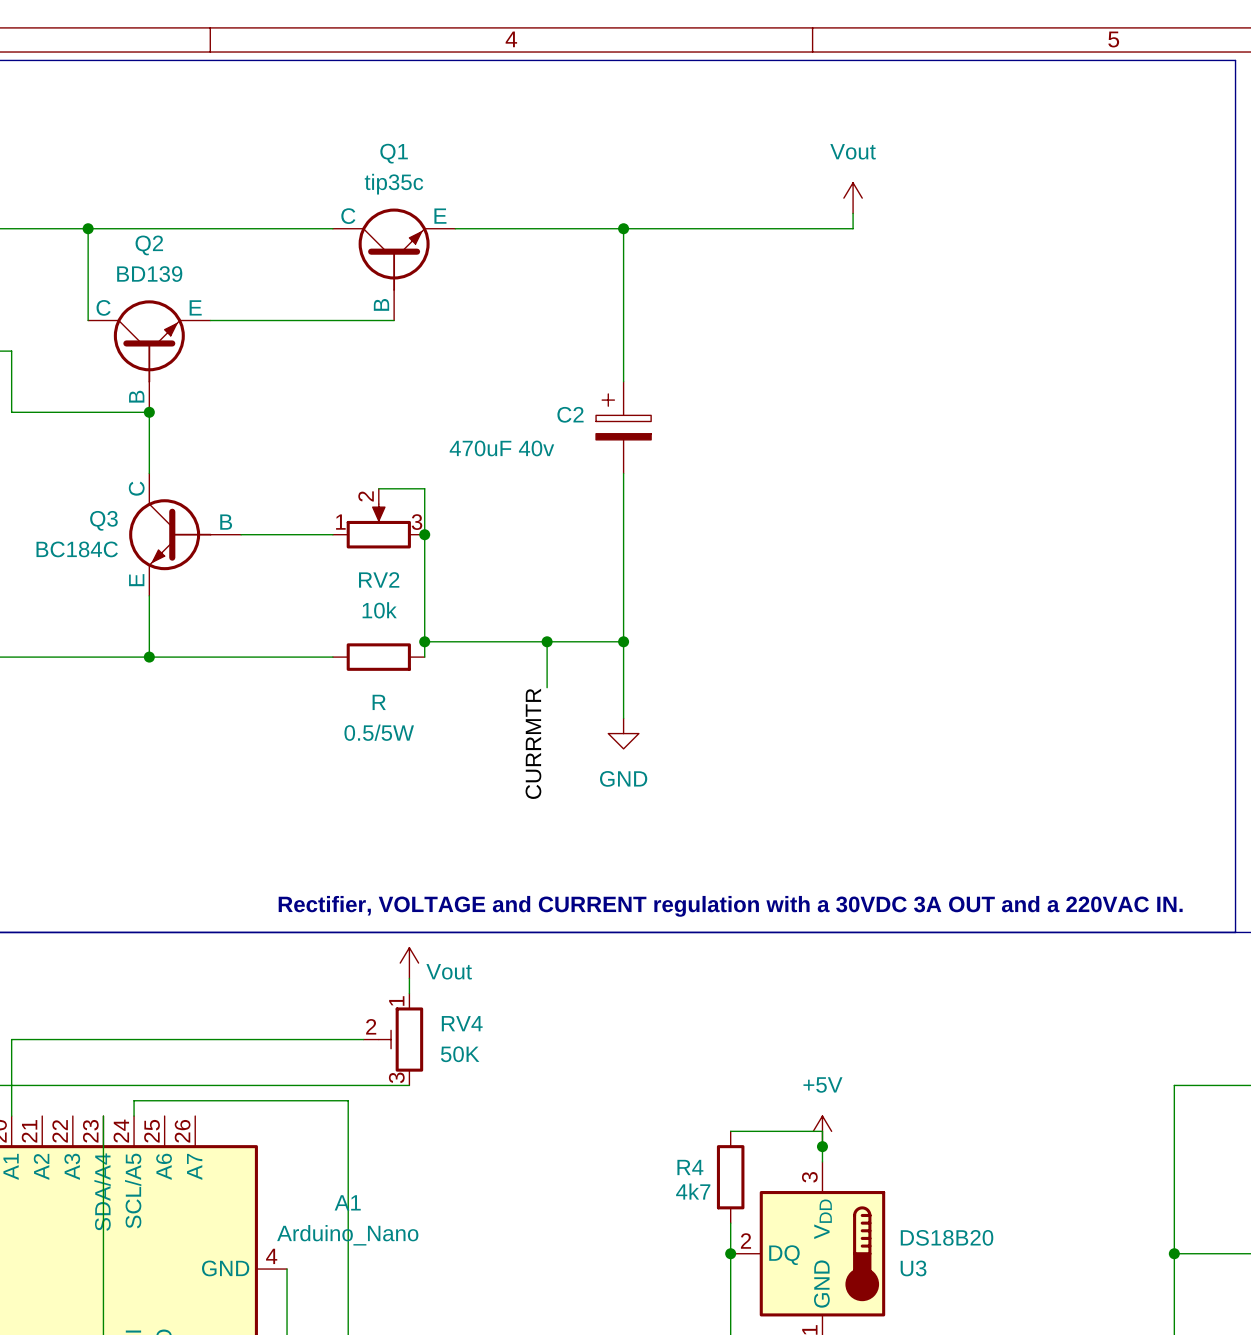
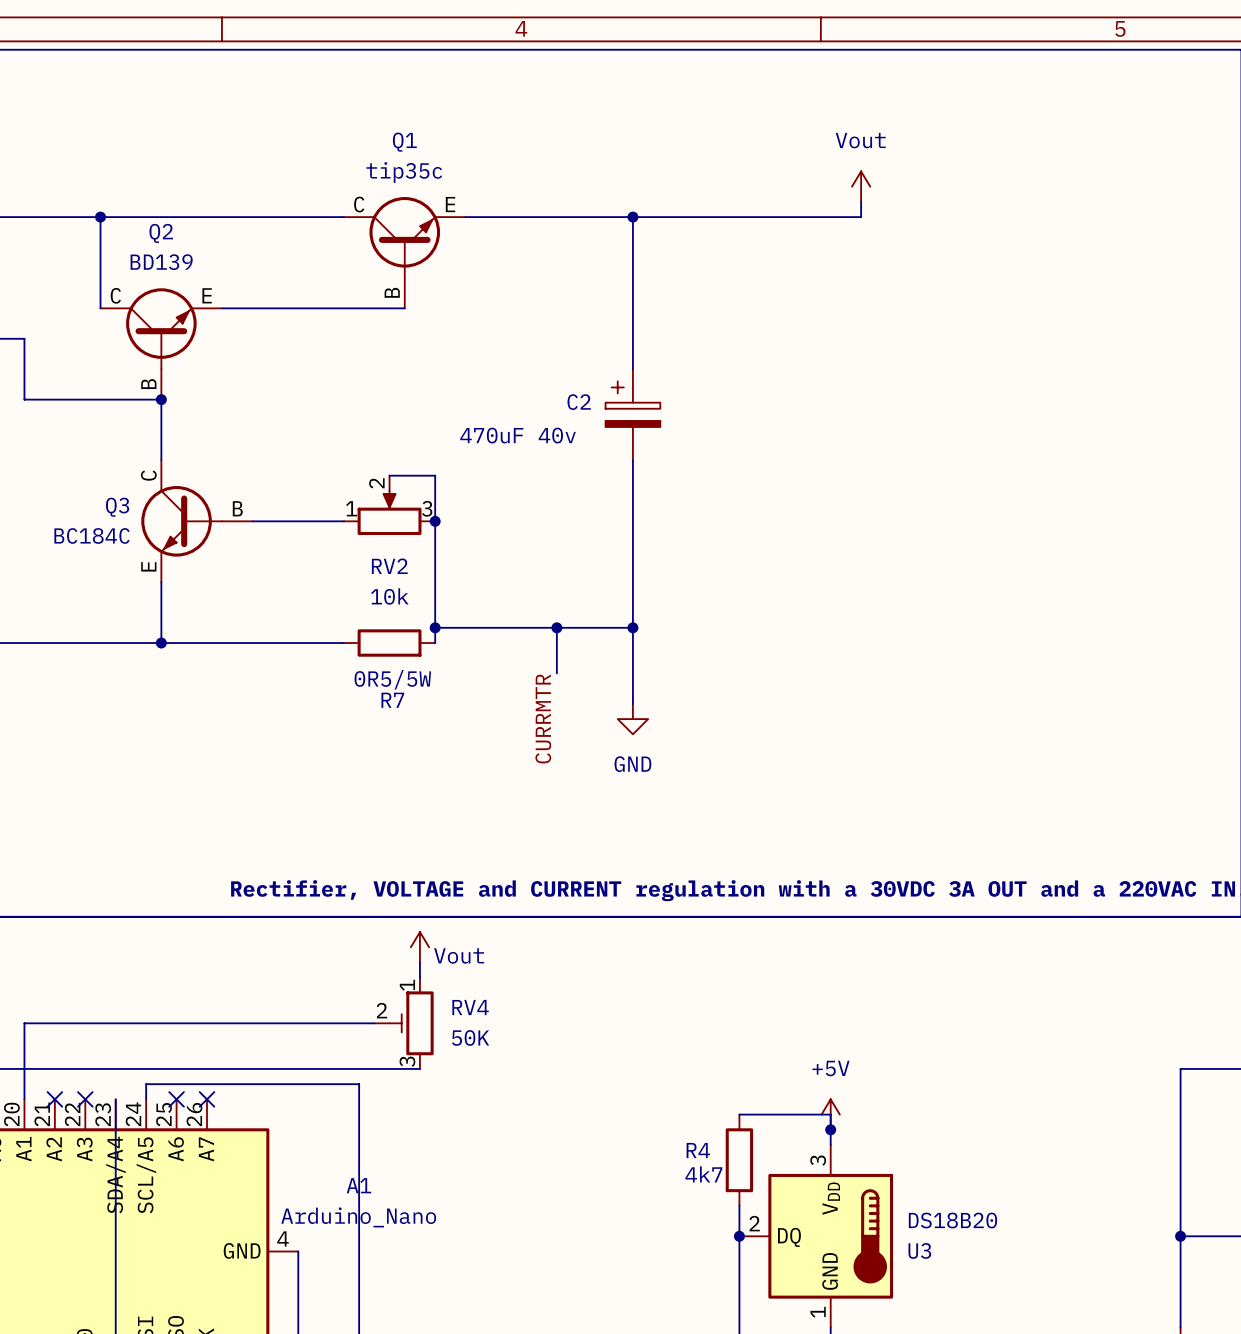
0.5/5W value: R (379, 702) -> 0R5/5W (392, 679)
0.5/5W name: 0.5/5W (379, 732) -> R7 (392, 700)
no-connect mark: none -> (54, 1099)
no-connect mark: none -> (85, 1099)
no-connect mark: none -> (176, 1099)
no-connect mark: none -> (207, 1099)

